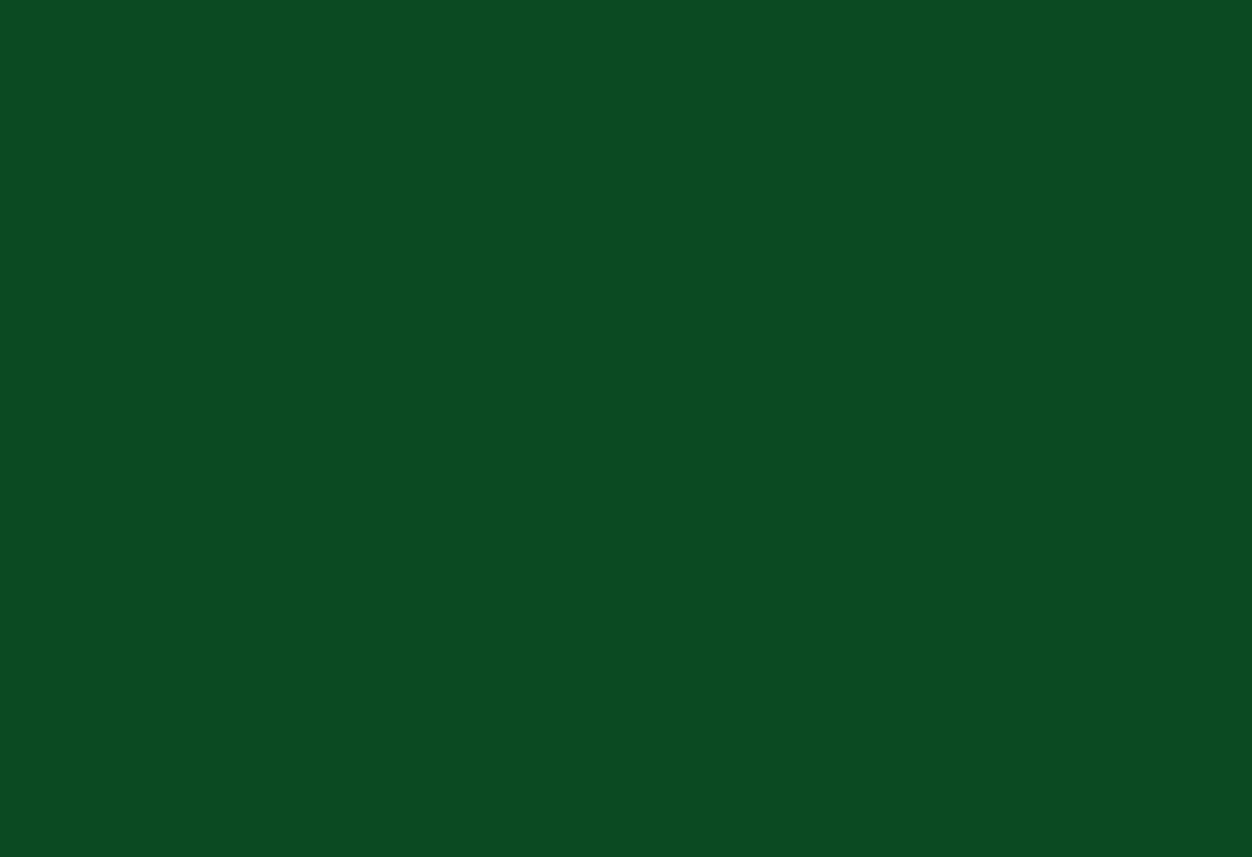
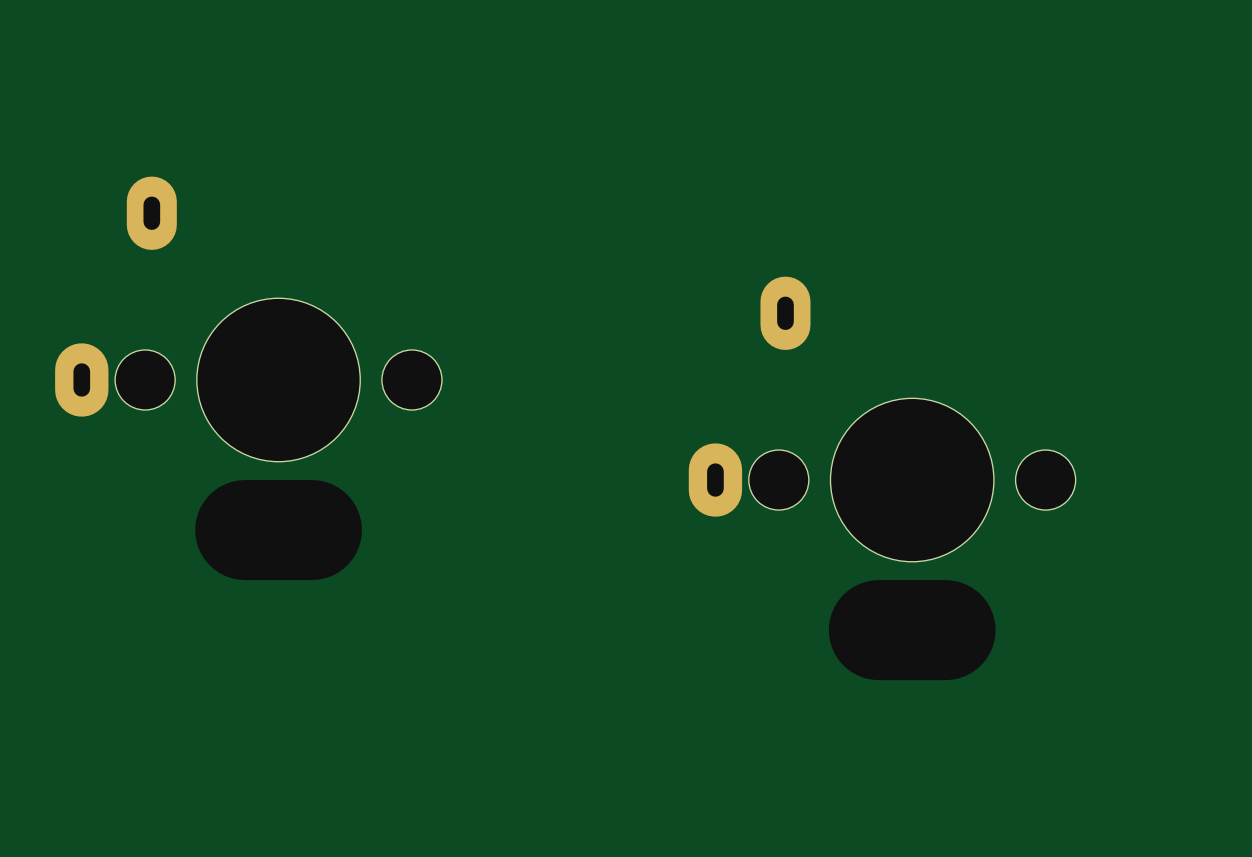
part: none -> (248, 378)
part: none -> (882, 478)

